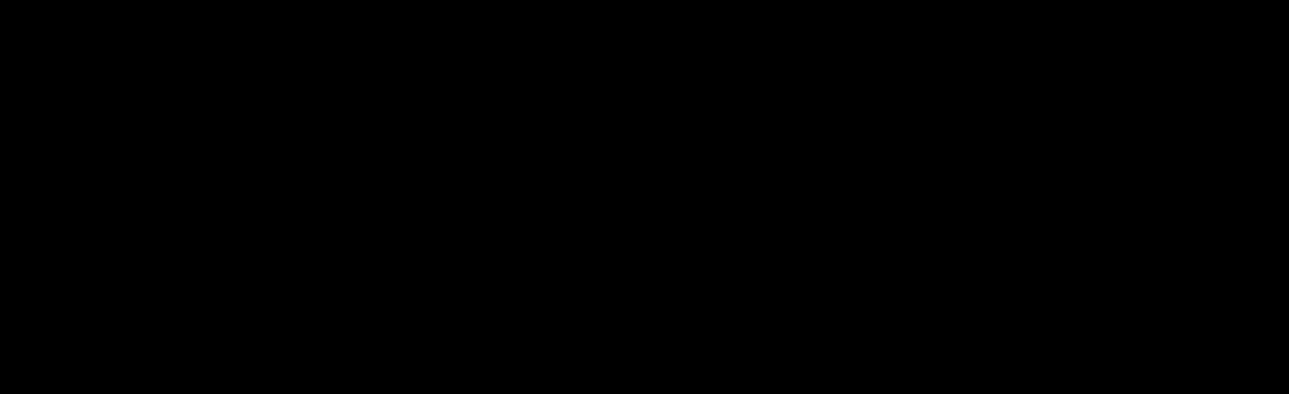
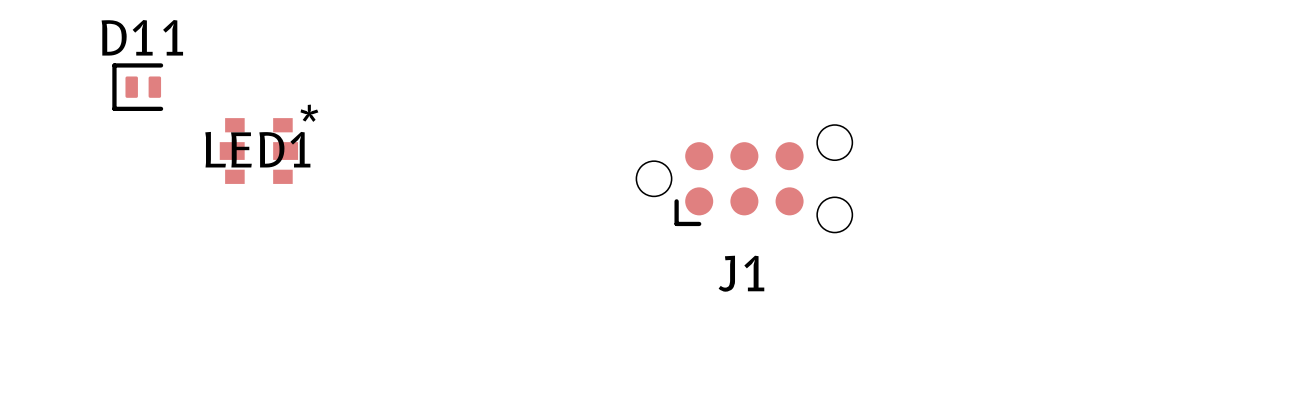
D11: none -> (137, 87)
LED1: none -> (258, 151)
J1: none -> (744, 178)

